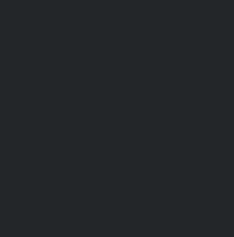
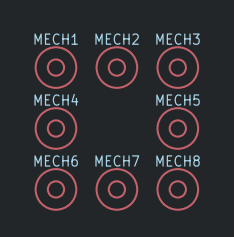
MECH1: none -> (55, 67)
MECH2: none -> (116, 67)
MECH3: none -> (177, 67)
MECH4: none -> (55, 128)
MECH5: none -> (177, 128)
MECH6: none -> (55, 189)
MECH7: none -> (116, 189)
MECH8: none -> (177, 189)

